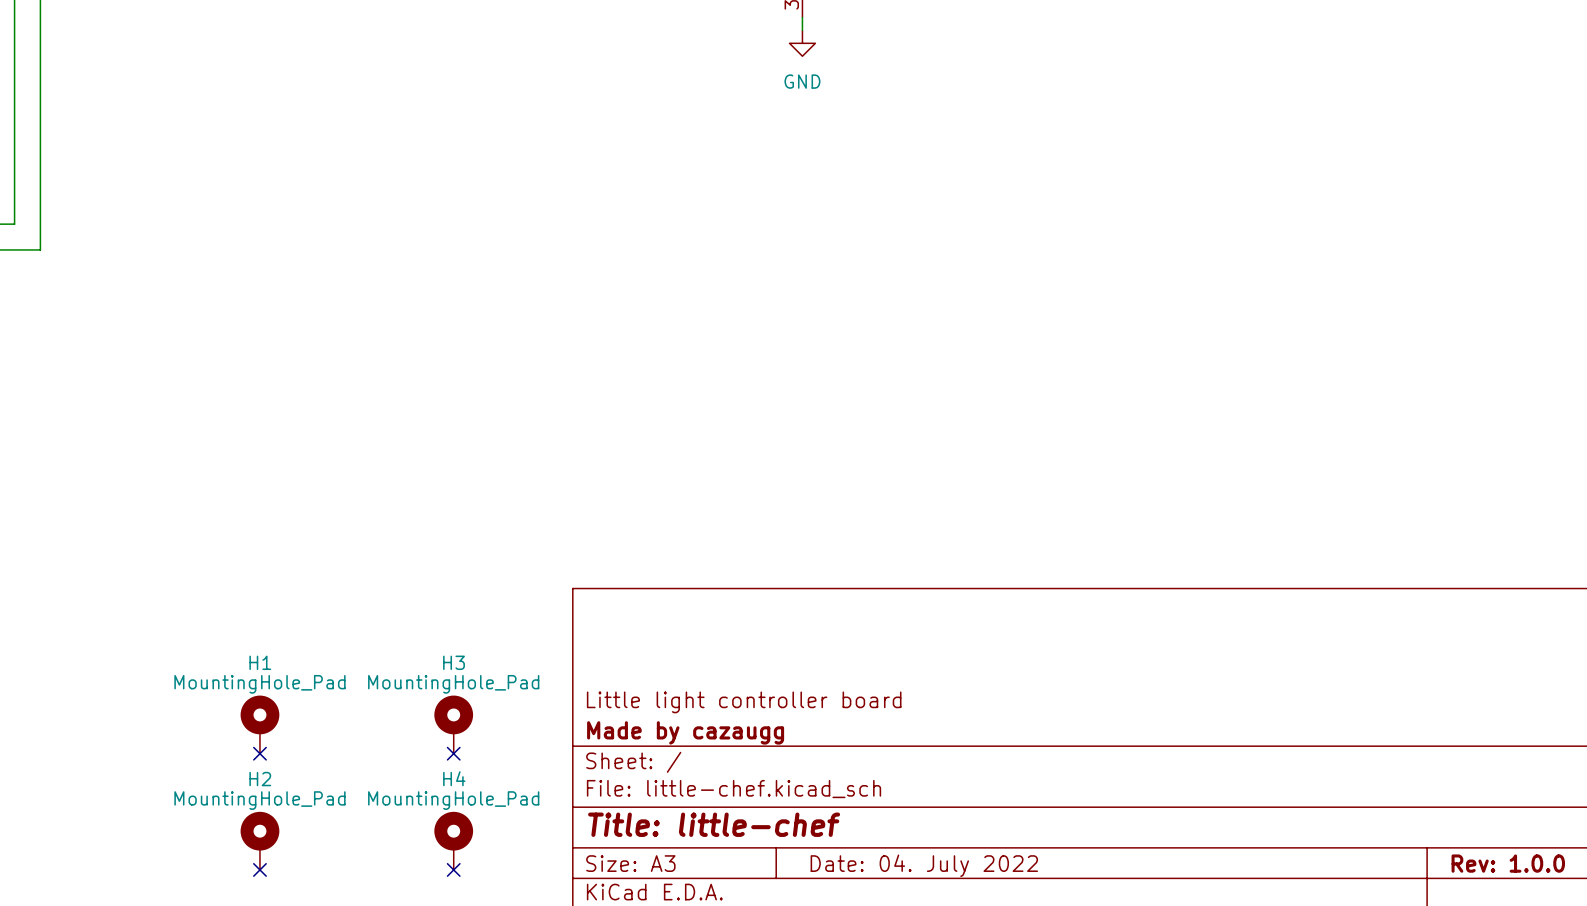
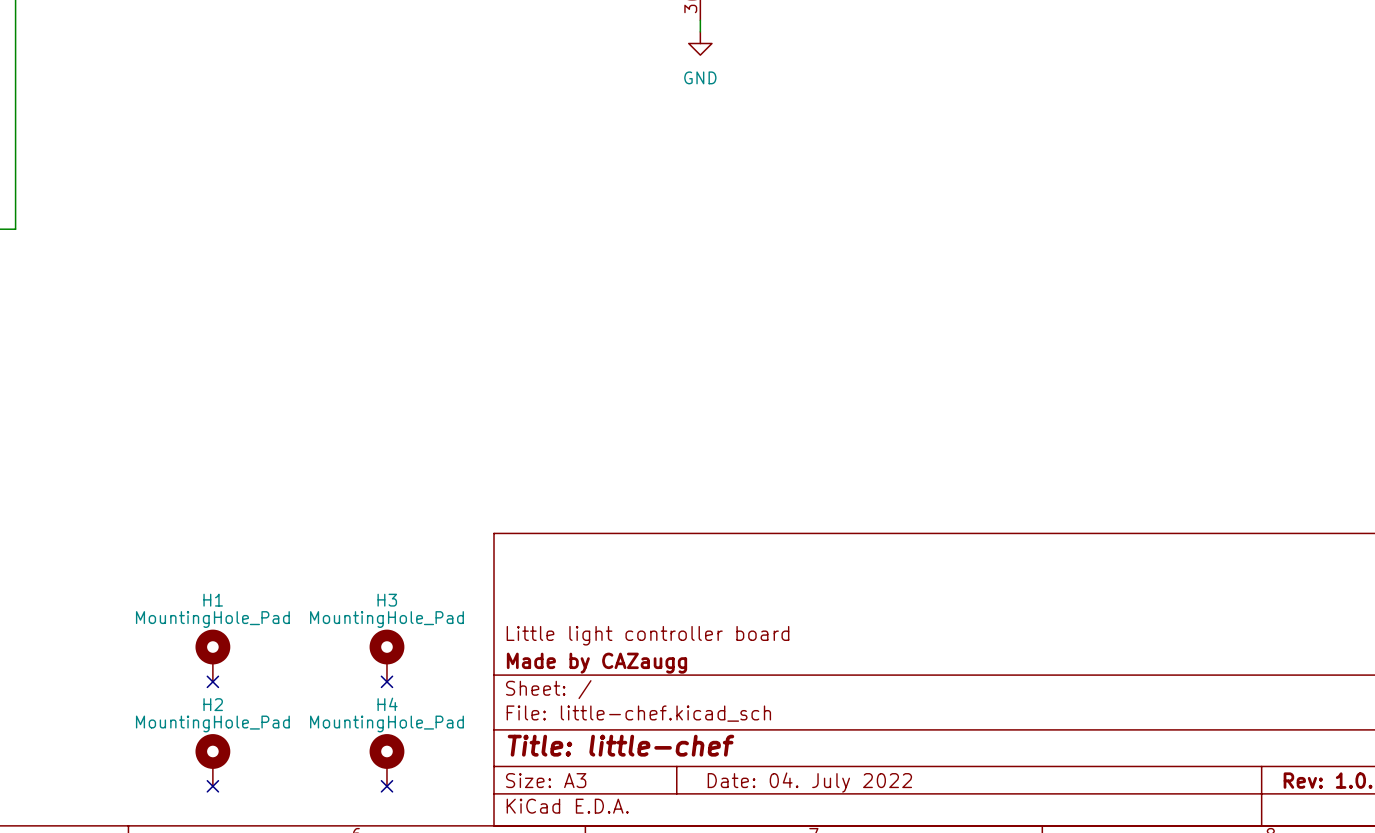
title block: Made by cazaugg (685, 732) -> Made by CAZaugg (596, 663)

